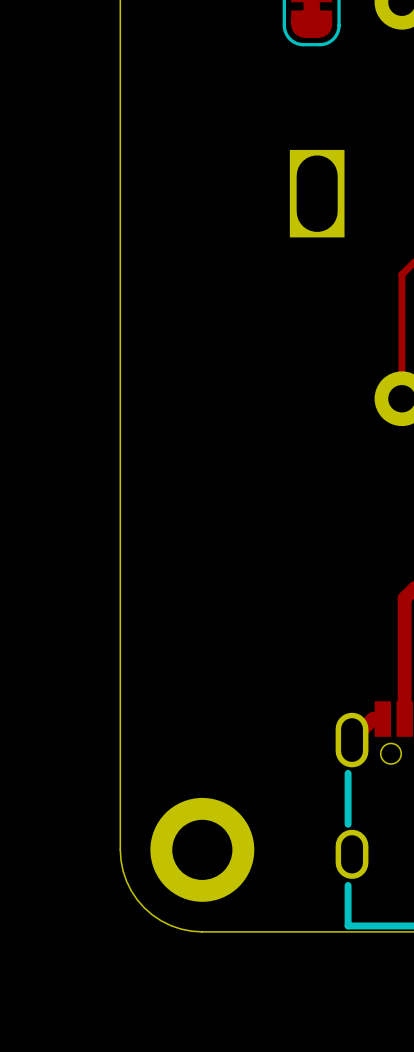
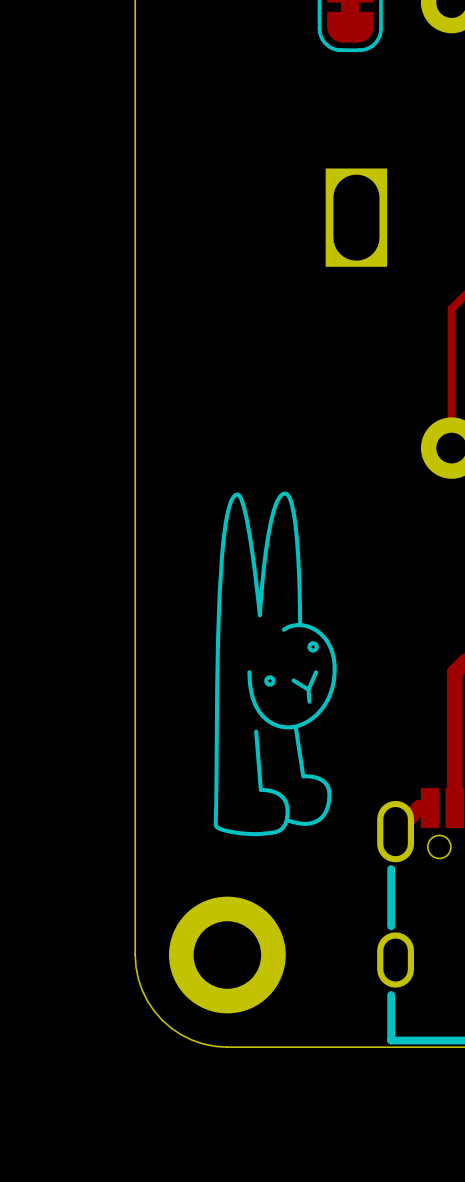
drawing: none -> [213, 491, 337, 837]

